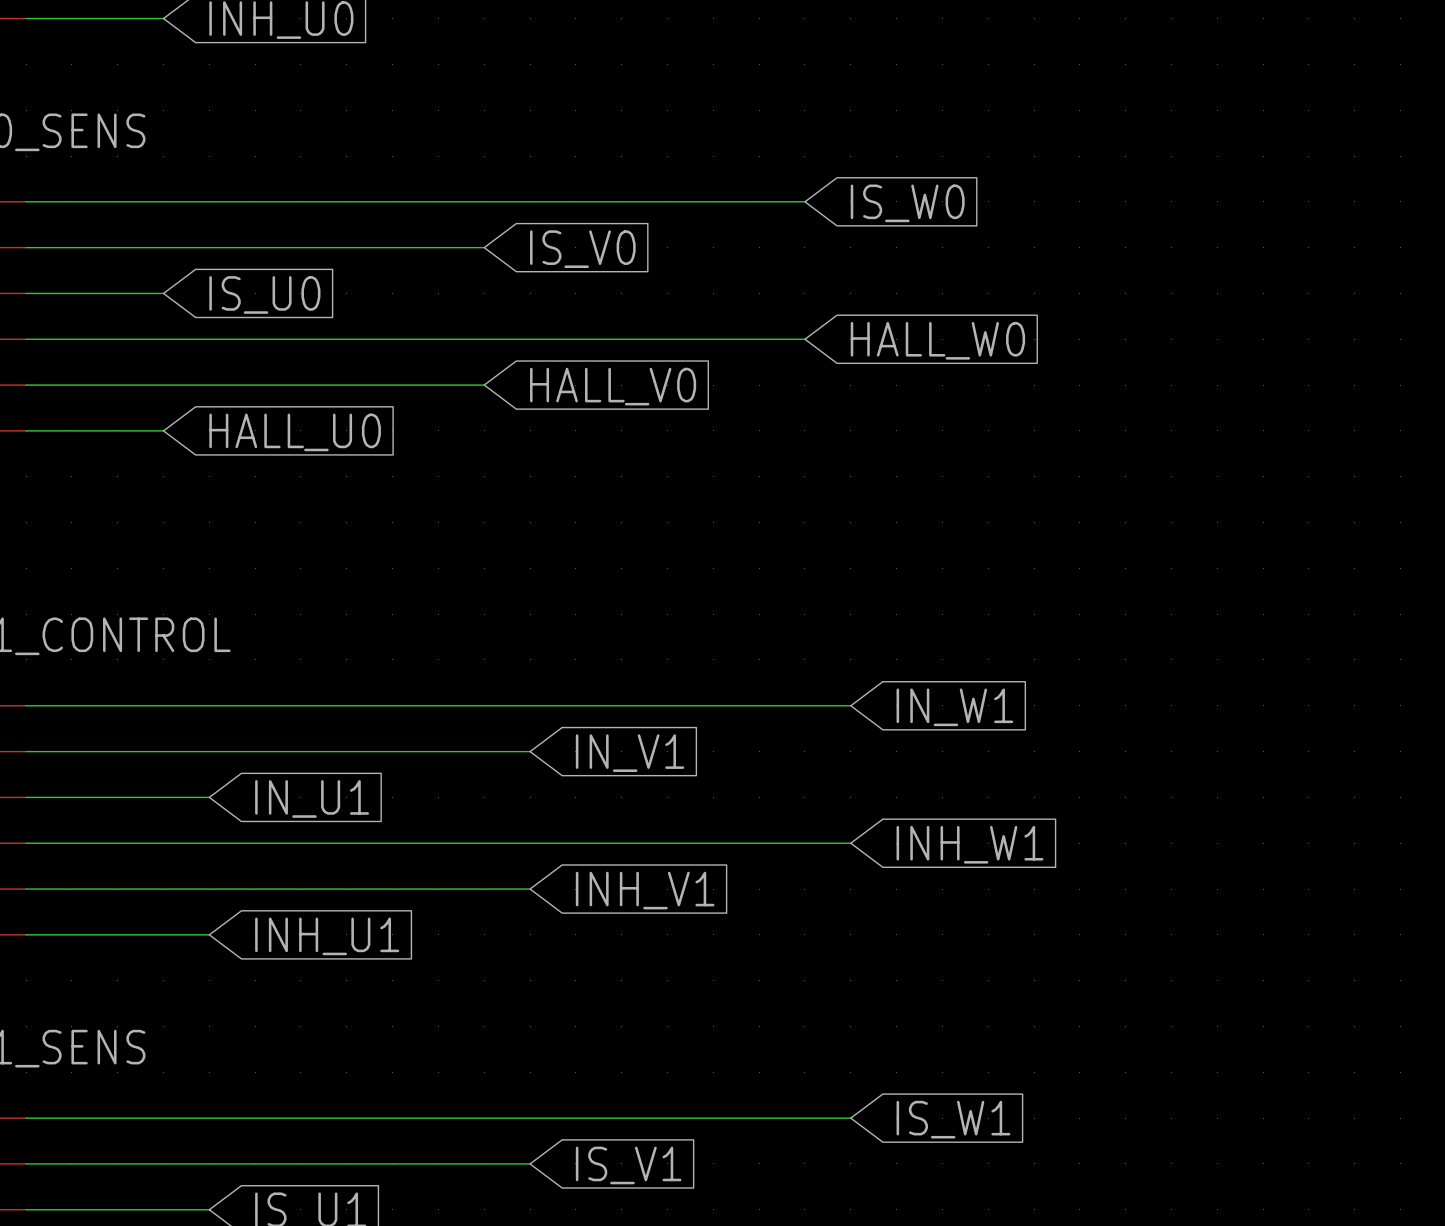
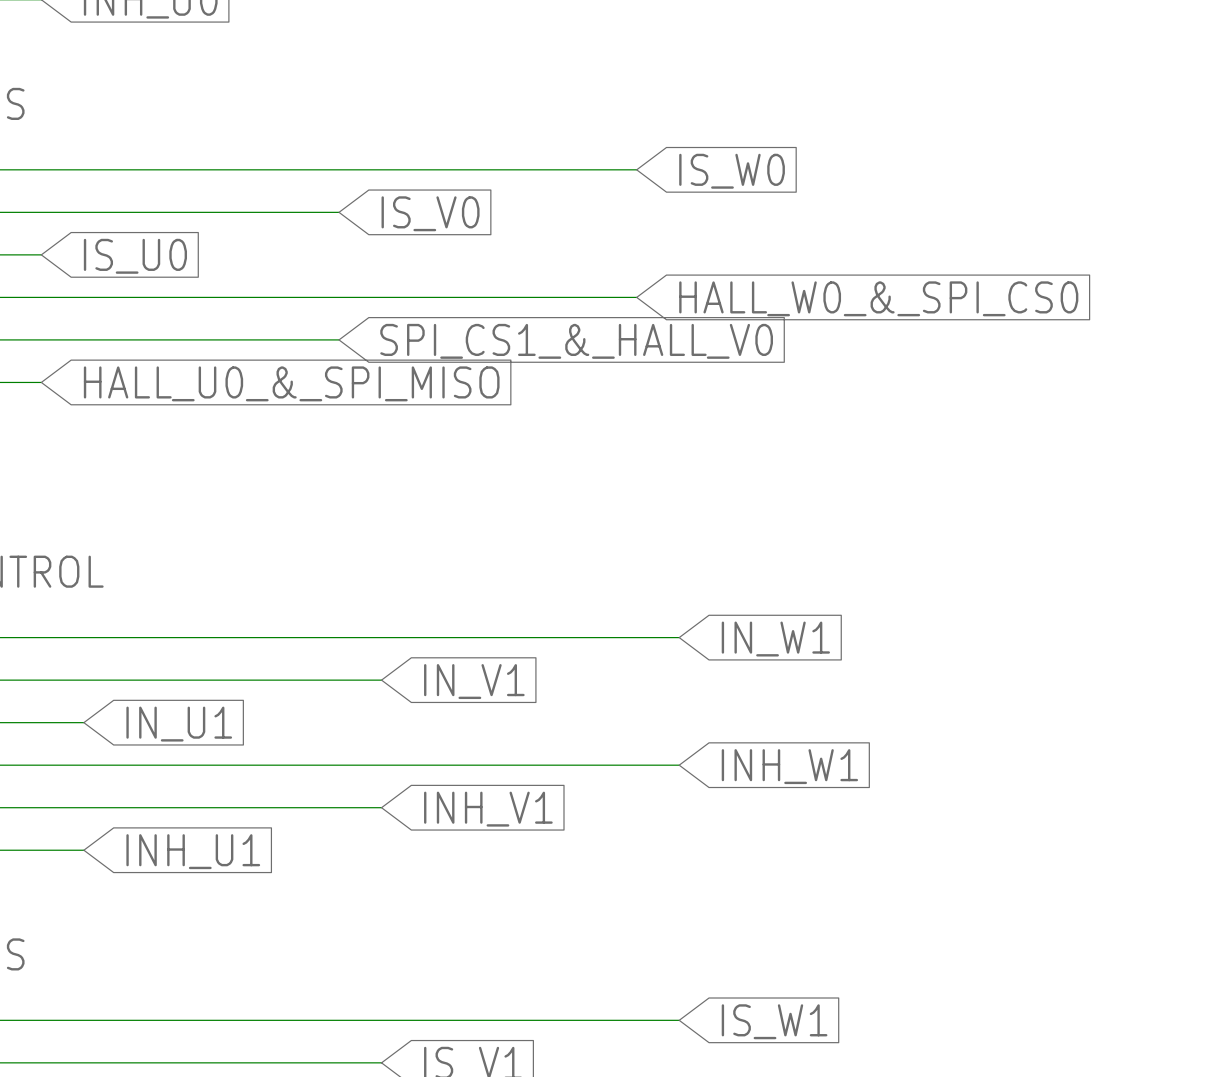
global label: HALL_W0 (937, 340) -> HALL_W0_&_SPI_CS0 (878, 298)
global label: HALL_V0 (613, 386) -> SPI_CS1_&_HALL_V0 (576, 341)
global label: HALL_U0 (295, 432) -> HALL_U0_&_SPI_MISO (291, 383)

